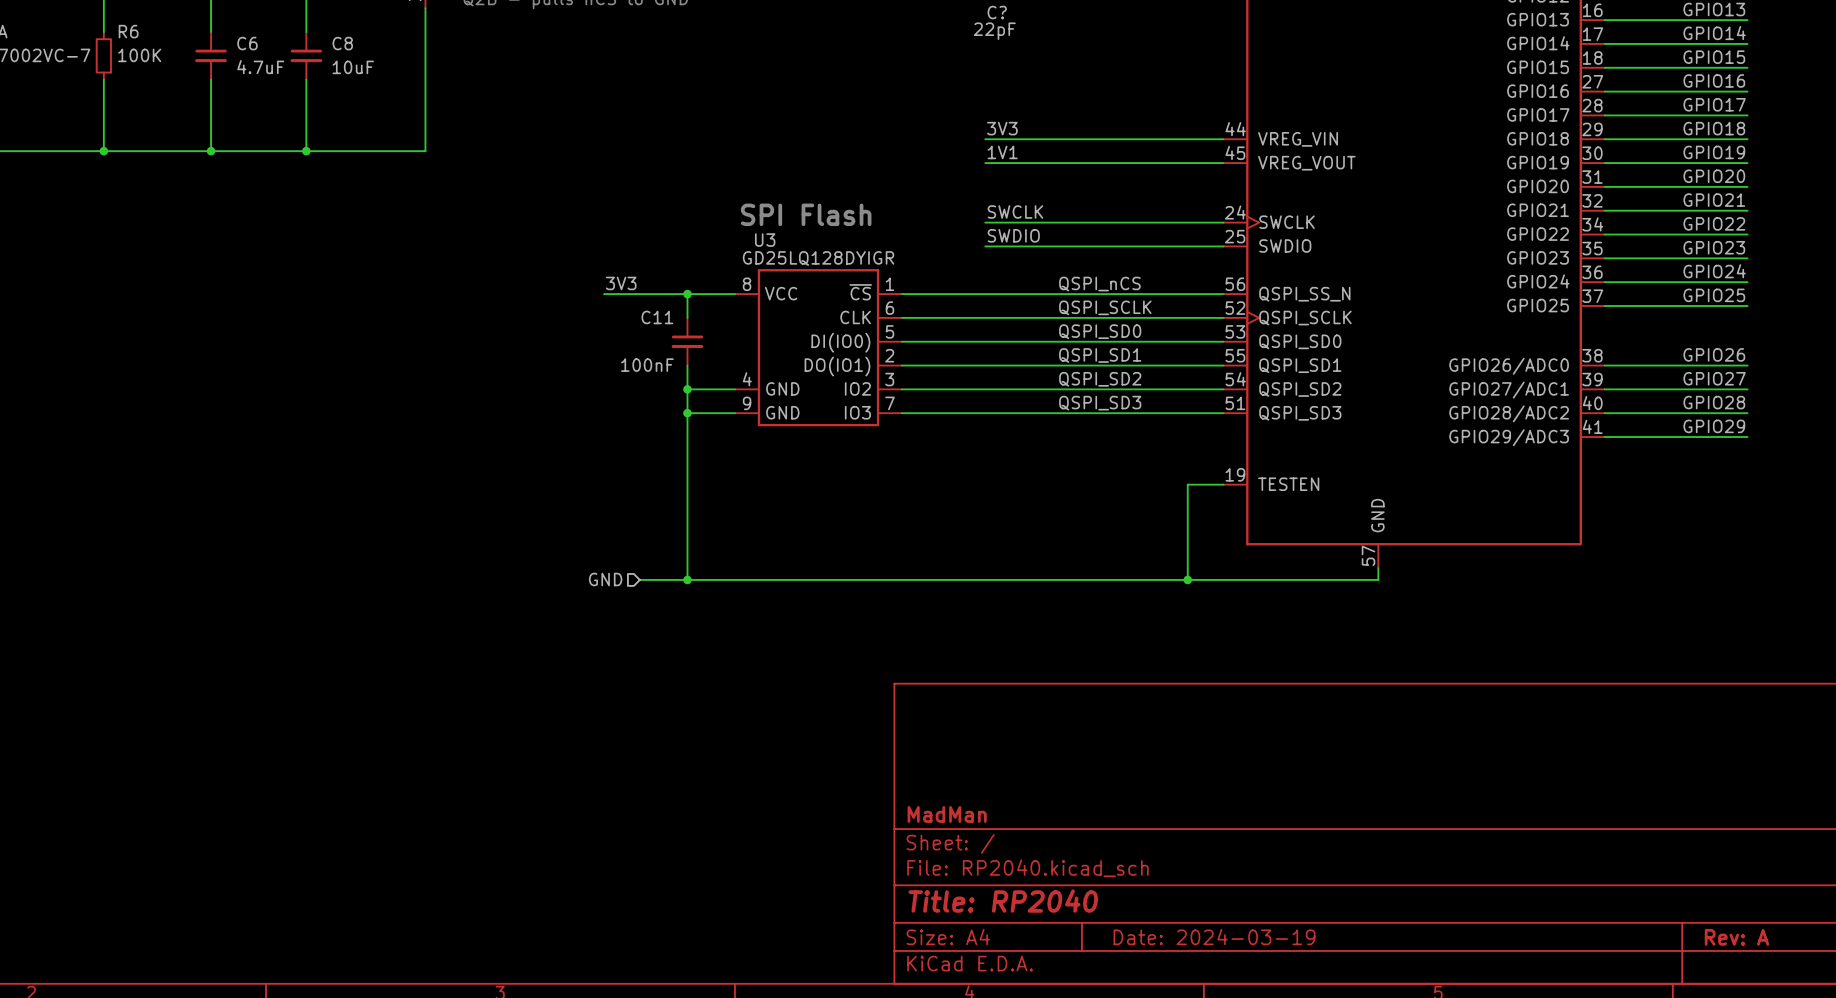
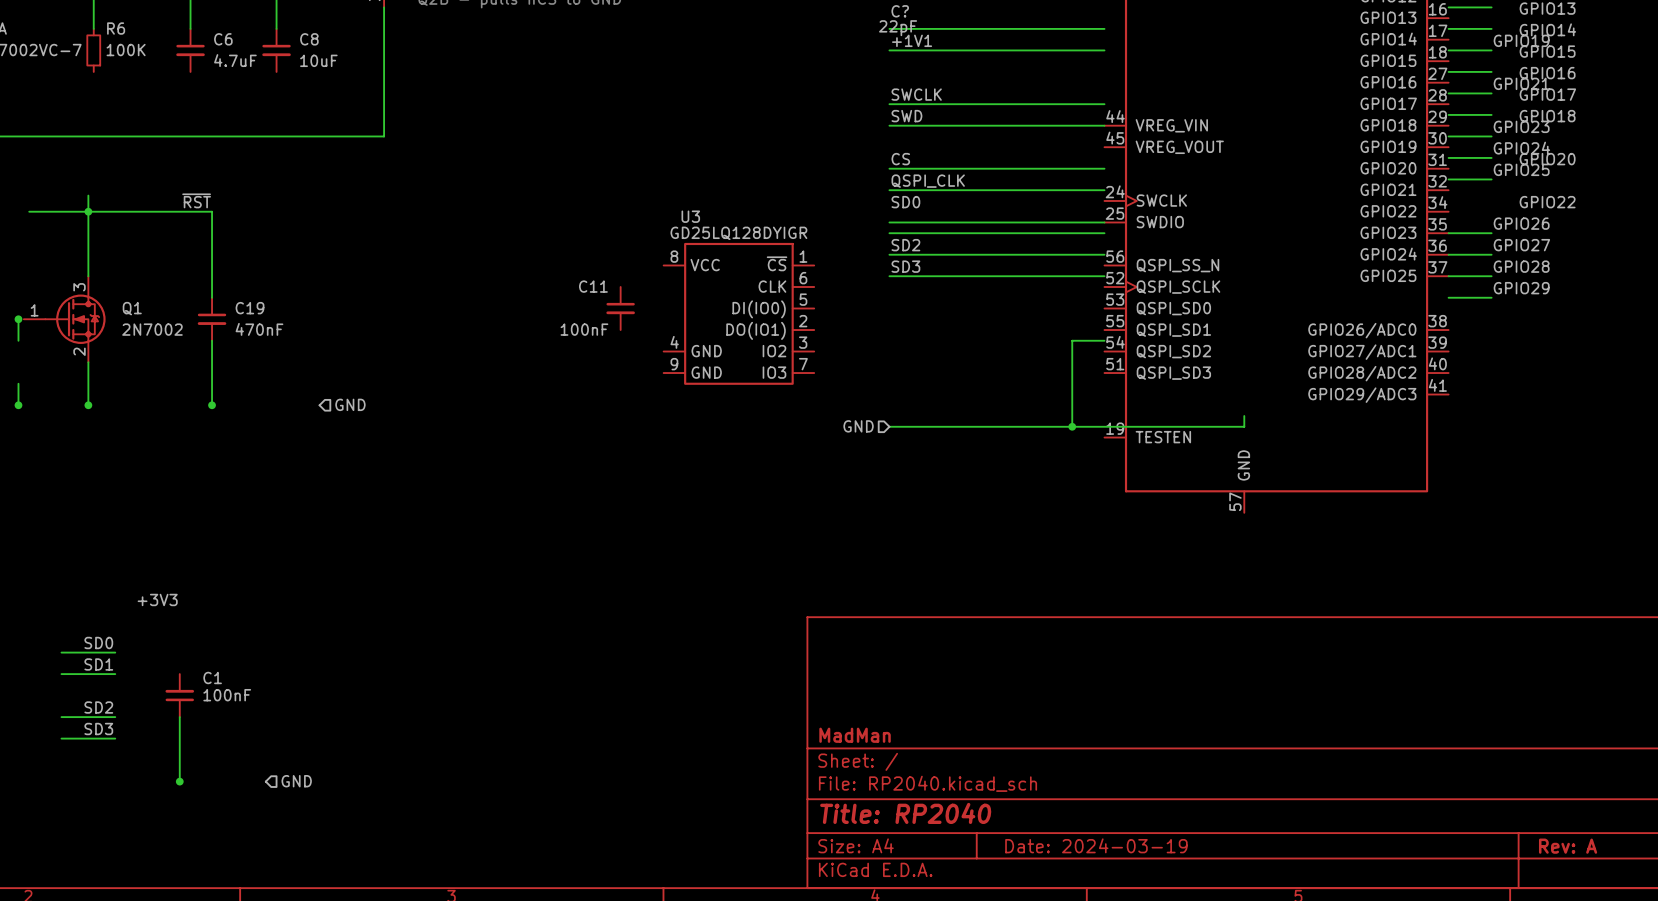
wire: none -> (1448, 7) (1491, 7)
wire: (1604, 20) (1747, 20) -> none
wire: none -> (889, 28) (1104, 28)
wire: none -> (1448, 28) (1491, 28)
wire: (1604, 43) (1747, 43) -> none
label: none -> +1V1 (912, 40)
wire: none -> (1448, 50) (1491, 50)
wire: (1604, 67) (1747, 67) -> none
wire: (103, 79) (103, 151) -> none
wire: (211, 79) (211, 151) -> none
wire: (306, 79) (306, 151) -> none
wire: none -> (1448, 71) (1491, 71)
wire: (1604, 91) (1747, 91) -> none
wire: none -> (1448, 93) (1491, 93)
wire: (1604, 115) (1747, 115) -> none
wire: none -> (1448, 114) (1491, 114)
label: 3V3 (1002, 128) -> SWD (906, 116)
wire: (1604, 139) (1747, 139) -> none
junction: (103, 151) -> none
junction: (211, 151) -> none
junction: (306, 151) -> none
wire: none -> (1448, 136) (1491, 136)
label: 1V1 (1002, 152) -> none
label position: GPIO19 (1714, 152) -> GPIO19 (1521, 40)
wire: (985, 163) (1223, 163) -> (889, 50) (1104, 50)
wire: (1604, 163) (1747, 163) -> none
wire: none -> (1448, 157) (1491, 157)
label: none -> CS (900, 159)
wire: none -> (889, 168) (1104, 168)
wire: (1604, 186) (1747, 186) -> none
wire: none -> (1448, 179) (1491, 179)
label: none -> QSPI_CLK (928, 181)
label position: GPIO21 (1714, 200) -> GPIO21 (1521, 83)
wire: none -> (889, 190) (1104, 190)
wire: (1604, 210) (1747, 210) -> none
label position: SWCLK (1015, 211) -> SWCLK (916, 94)
text: SPI Flash (806, 214) -> none
wire: none -> (88, 195) (88, 276)
label: none -> ~{RST} (196, 200)
wire: (985, 222) (1223, 222) -> (889, 104) (1104, 104)
label: none -> SD0 (905, 202)
wire: none -> (29, 211) (212, 211) (212, 297)
junction: none -> (88, 211)
wire: (1604, 234) (1747, 234) -> none
label: SWDIO (1013, 235) -> none
label position: GPIO23 (1714, 247) -> GPIO23 (1521, 126)
wire: none -> (889, 233) (1104, 233)
wire: (1652, 258) (1747, 258) -> none
label: none -> SD2 (905, 245)
label position: GPIO24 (1714, 271) -> GPIO24 (1521, 148)
wire: none -> (889, 254) (1104, 254)
wire: (1652, 282) (1747, 282) -> none
label: 3V3 (621, 283) -> none
label: QSPI_nCS (1099, 284) -> none
wire: (604, 294) (735, 294) -> none
wire: (687, 294) (687, 317) -> none
junction: (687, 294) -> none
wire: (901, 294) (1223, 294) -> none
label: none -> SD3 (905, 266)
label position: GPIO25 (1714, 295) -> GPIO25 (1521, 169)
wire: none -> (889, 276) (1104, 276)
wire: (1652, 306) (1747, 306) -> none
label: QSPI_SCLK (1105, 307) -> none
wire: (901, 317) (1223, 317) -> none
wire: none -> (1448, 297) (1491, 297)
label: QSPI_SD0 (1100, 331) -> none
wire: (901, 341) (1223, 341) -> none
wire: none -> (18, 319) (18, 340)
junction: none -> (18, 319)
Q1: none -> 2N7002 (64, 319)
C19: none -> 470nF (212, 319)
label position: GPIO26 (1714, 354) -> GPIO26 (1521, 223)
label: QSPI_SD1 (1100, 355) -> none
wire: (687, 365) (687, 579) -> none
wire: (901, 365) (1223, 365) -> none
wire: (1604, 365) (1747, 365) -> none
wire: none -> (212, 340) (212, 405)
label position: GPIO27 (1714, 378) -> GPIO27 (1521, 245)
label: QSPI_SD2 (1100, 379) -> none
wire: (687, 389) (735, 389) -> none
junction: (687, 389) -> none
wire: (901, 389) (1223, 389) -> none
wire: (1604, 389) (1747, 389) -> none
wire: none -> (88, 362) (88, 405)
label position: GPIO28 (1714, 402) -> GPIO28 (1521, 266)
label: QSPI_SD3 (1100, 403) -> none
wire: (687, 413) (735, 413) -> none
junction: (687, 413) -> none
wire: (901, 413) (1223, 413) -> none
wire: (1604, 413) (1747, 413) -> none
wire: none -> (18, 383) (18, 405)
label position: GPIO29 (1714, 426) -> GPIO29 (1521, 288)
wire: (1604, 437) (1747, 437) -> none
junction: none -> (18, 405)
junction: none -> (88, 405)
junction: none -> (212, 405)
hierarchical label: none -> GND (350, 404)
wire: none -> (1244, 416) (1244, 426) (889, 426)
hierarchical label: none -> GND (858, 426)
junction: none -> (1072, 426)
wire: (1223, 484) (1187, 484) (1187, 579) -> (1104, 340) (1072, 340) (1072, 426)
wire: (1378, 568) (1378, 579) (639, 579) -> none
hierarchical label: GND (605, 579) -> none
junction: (687, 579) -> none
junction: (1187, 579) -> none
label: none -> +3V3 (157, 599)
label: none -> SD0 (98, 642)
wire: none -> (61, 652) (115, 652)
label: none -> SD1 (98, 664)
wire: none -> (61, 674) (115, 674)
C1: none -> 100nF (179, 695)
label: none -> SD2 (98, 707)
wire: none -> (61, 717) (115, 717)
wire: none -> (179, 717) (179, 781)
label: none -> SD3 (98, 729)
wire: none -> (61, 738) (115, 738)
junction: none -> (179, 781)
hierarchical label: none -> GND (296, 781)

